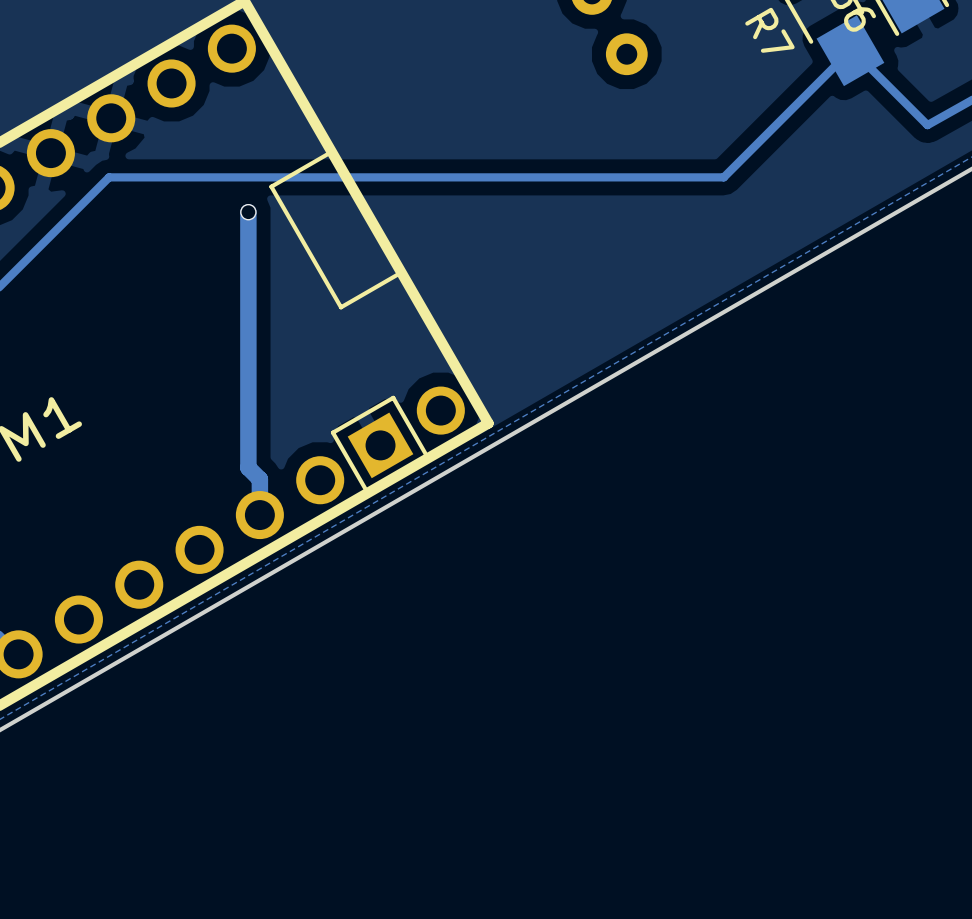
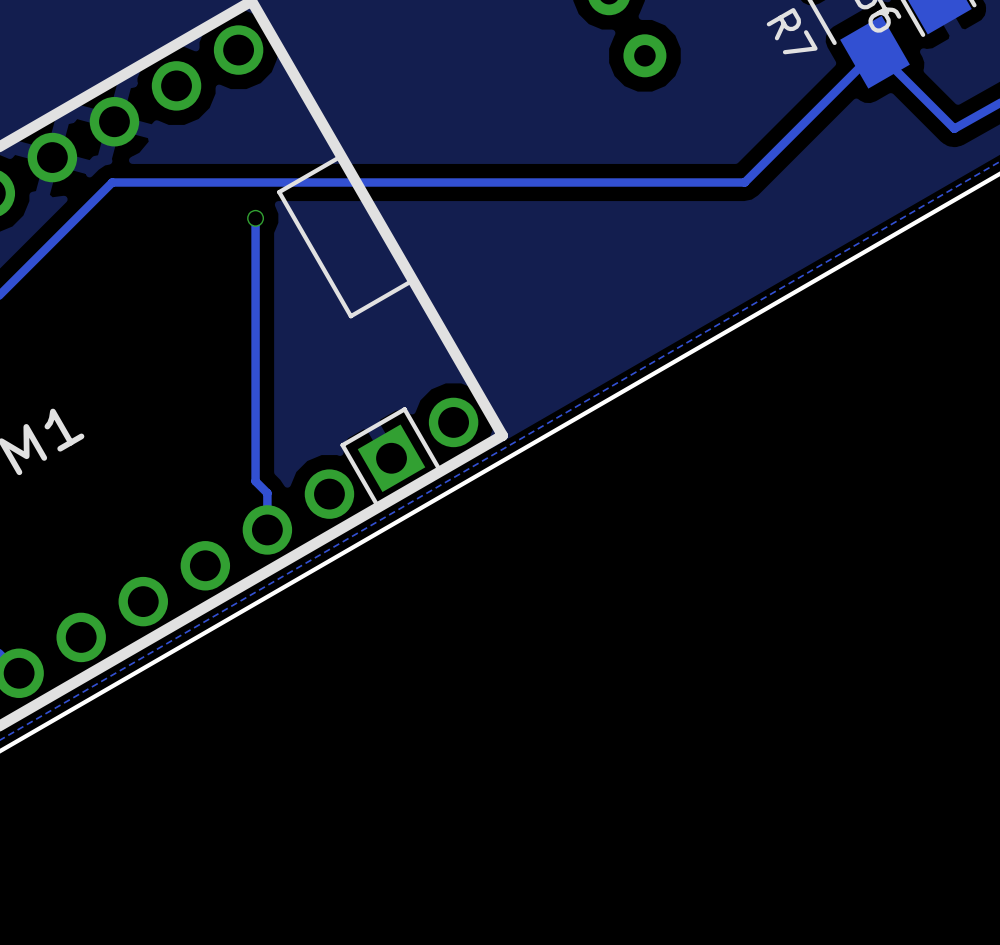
track width: thick (248, 212) (248, 467) (259, 479) (259, 515) -> thin (255, 218) (255, 481) (267, 493) (267, 529)

